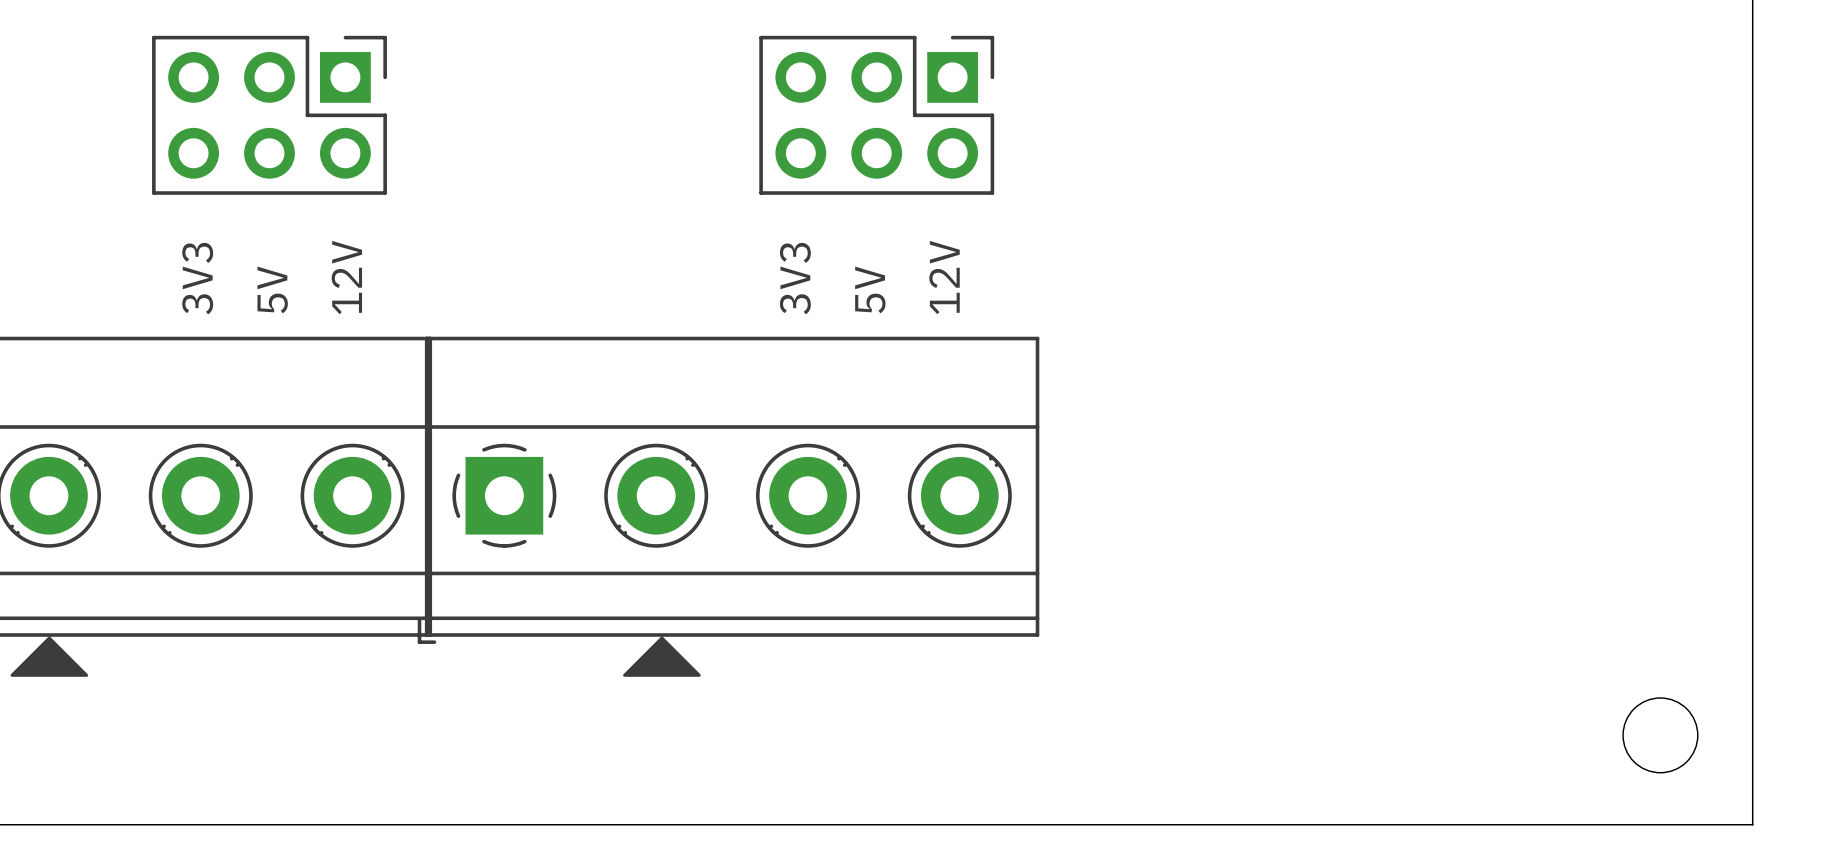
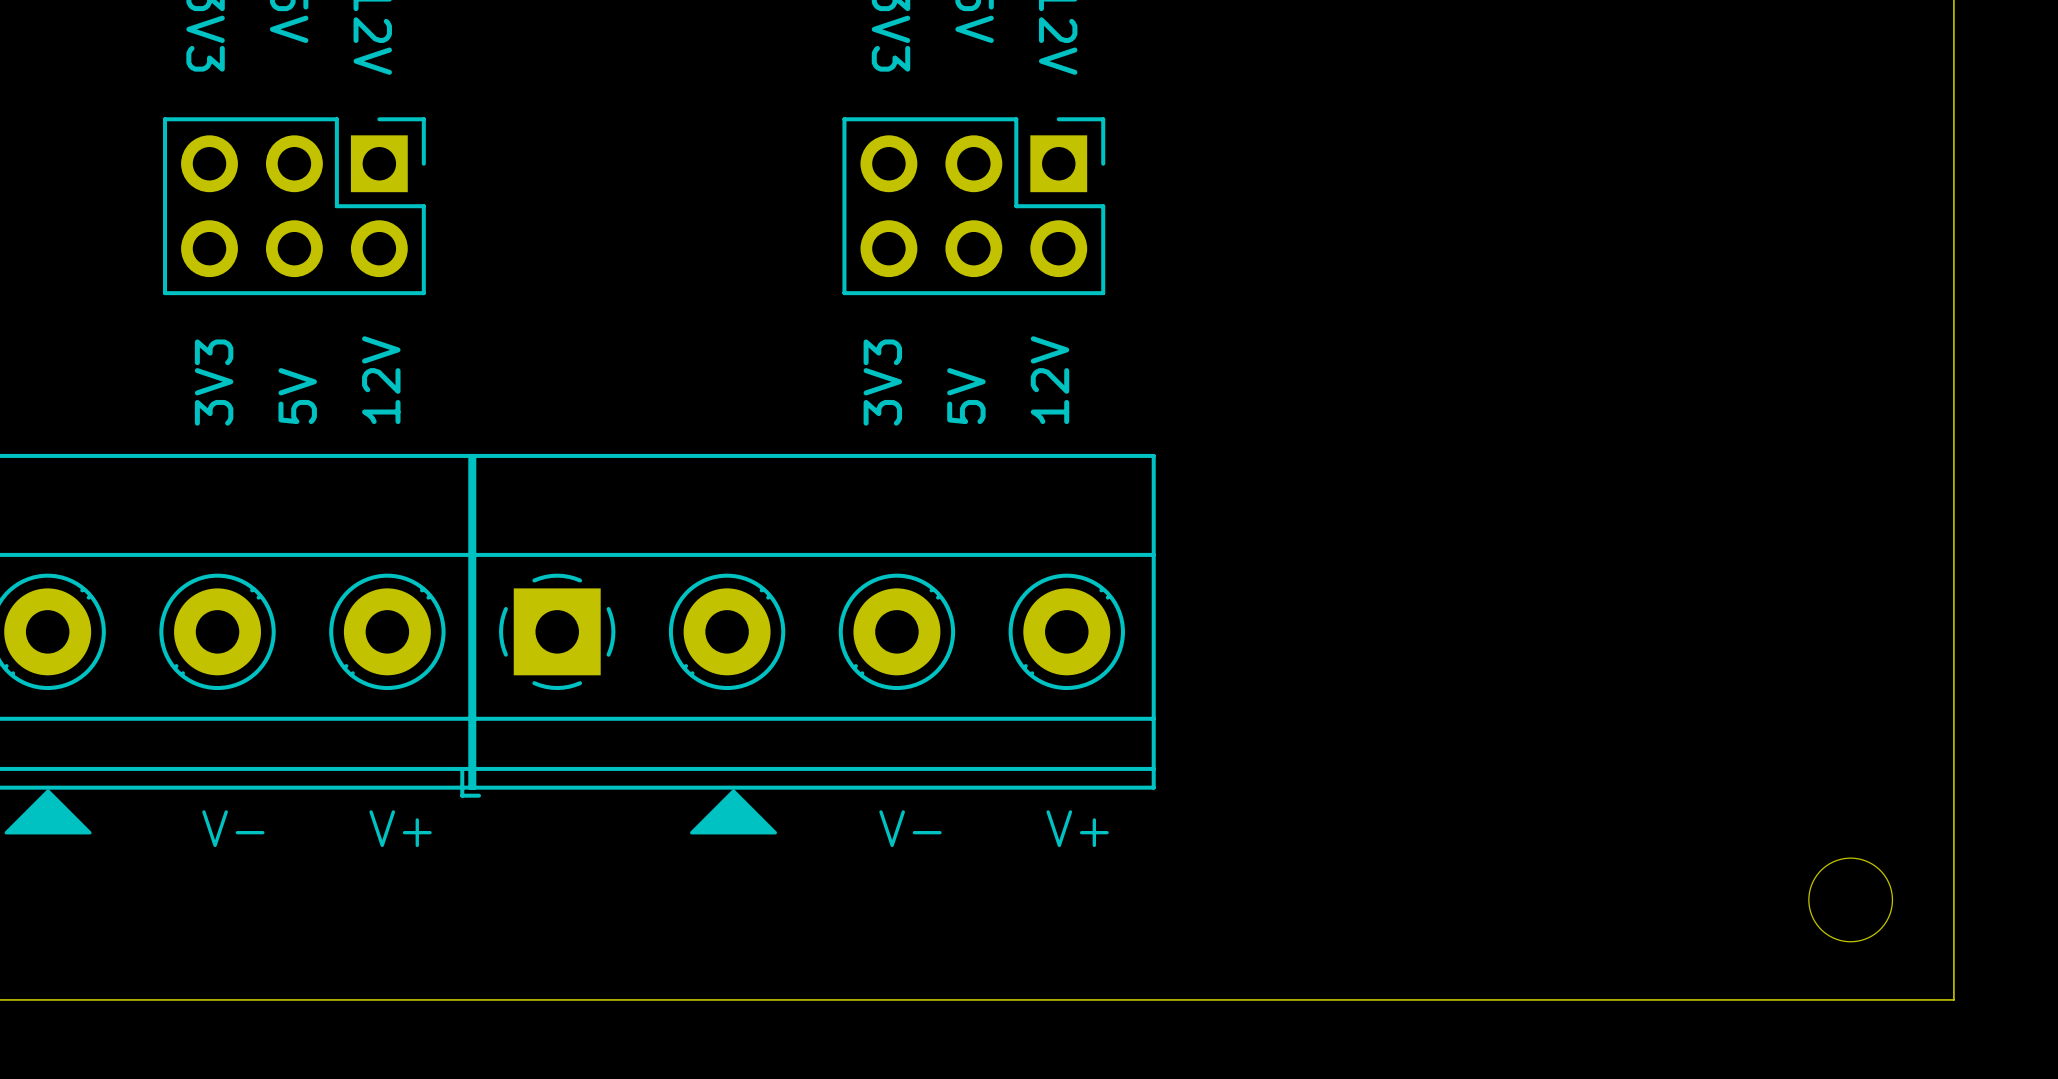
text: none -> V- (233, 828)
text: none -> V+ (400, 828)
text: none -> V- (910, 828)
text: none -> V+ (1077, 828)

